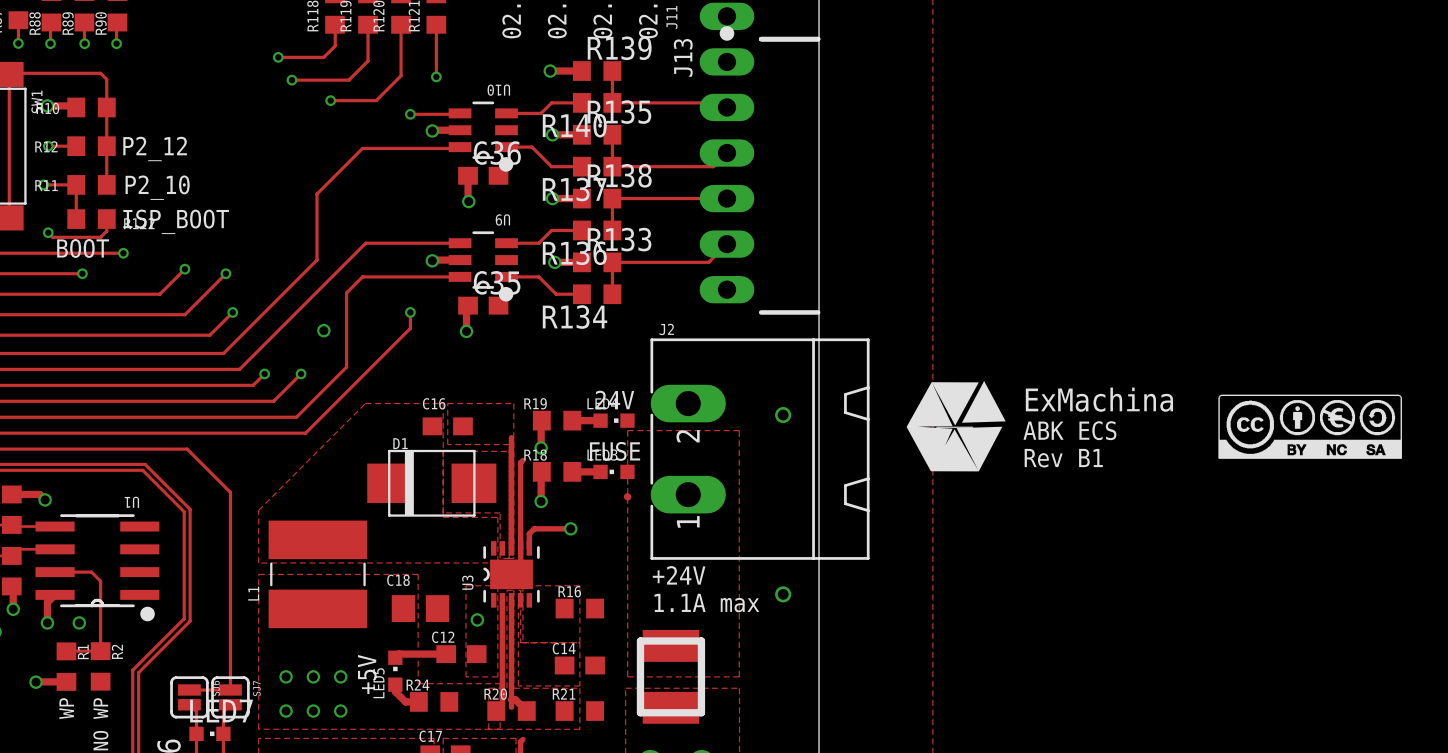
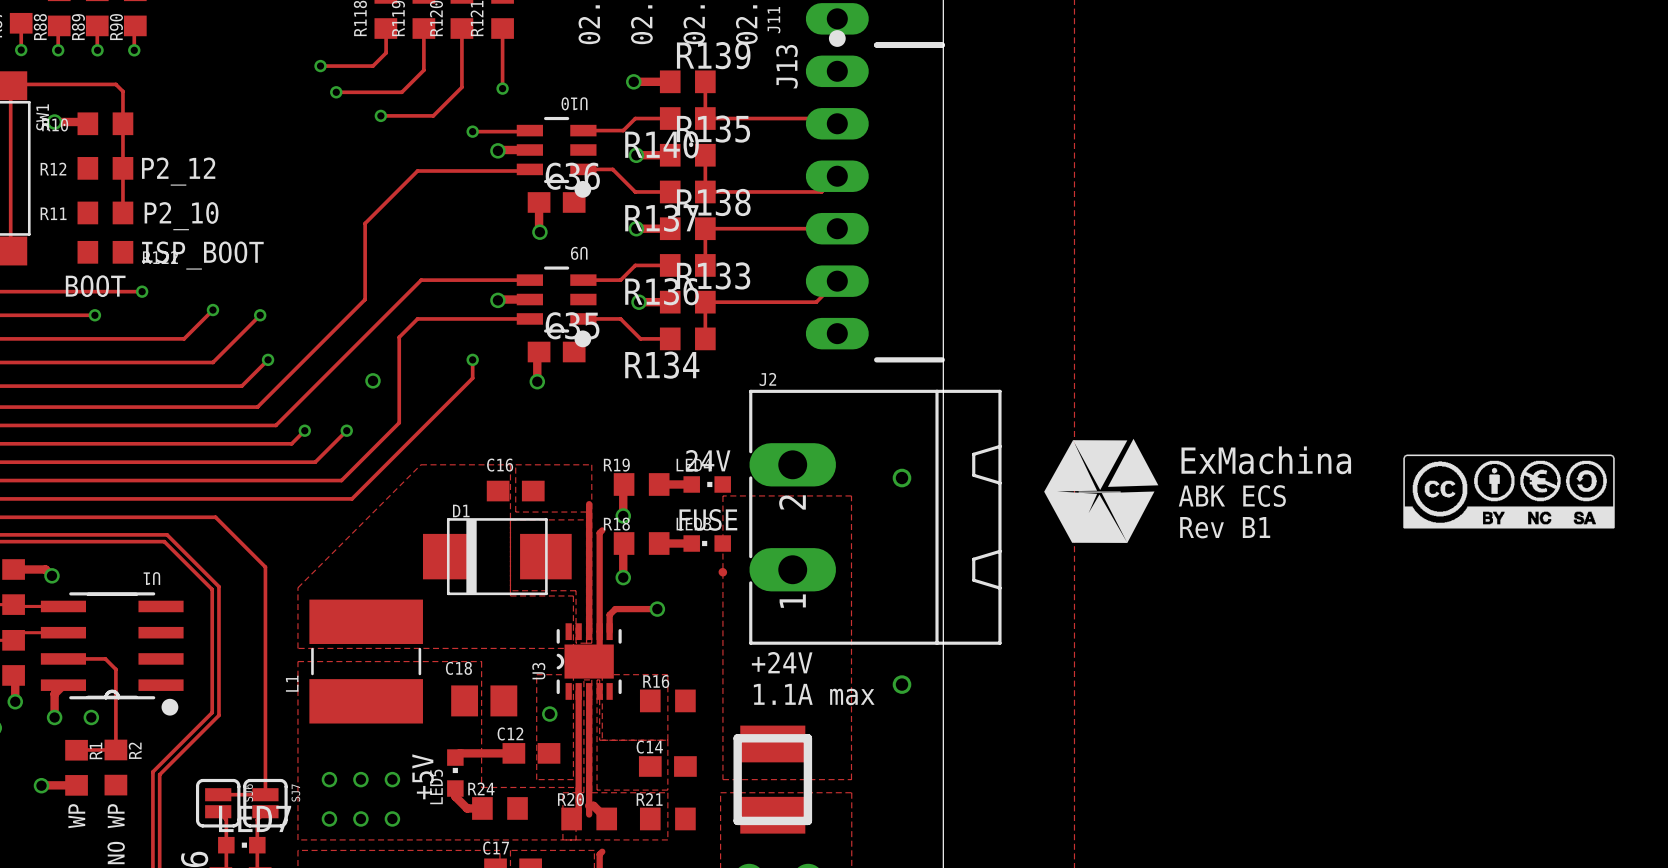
track: (48, 146) (76, 146) -> none
via: (48, 146) -> none
track: (43, 184) (76, 184) (76, 219) -> none
via: (43, 184) -> none
track: (106, 219) (106, 231) (100, 237) (52, 237) (48, 232) -> none
via: (48, 232) -> none

